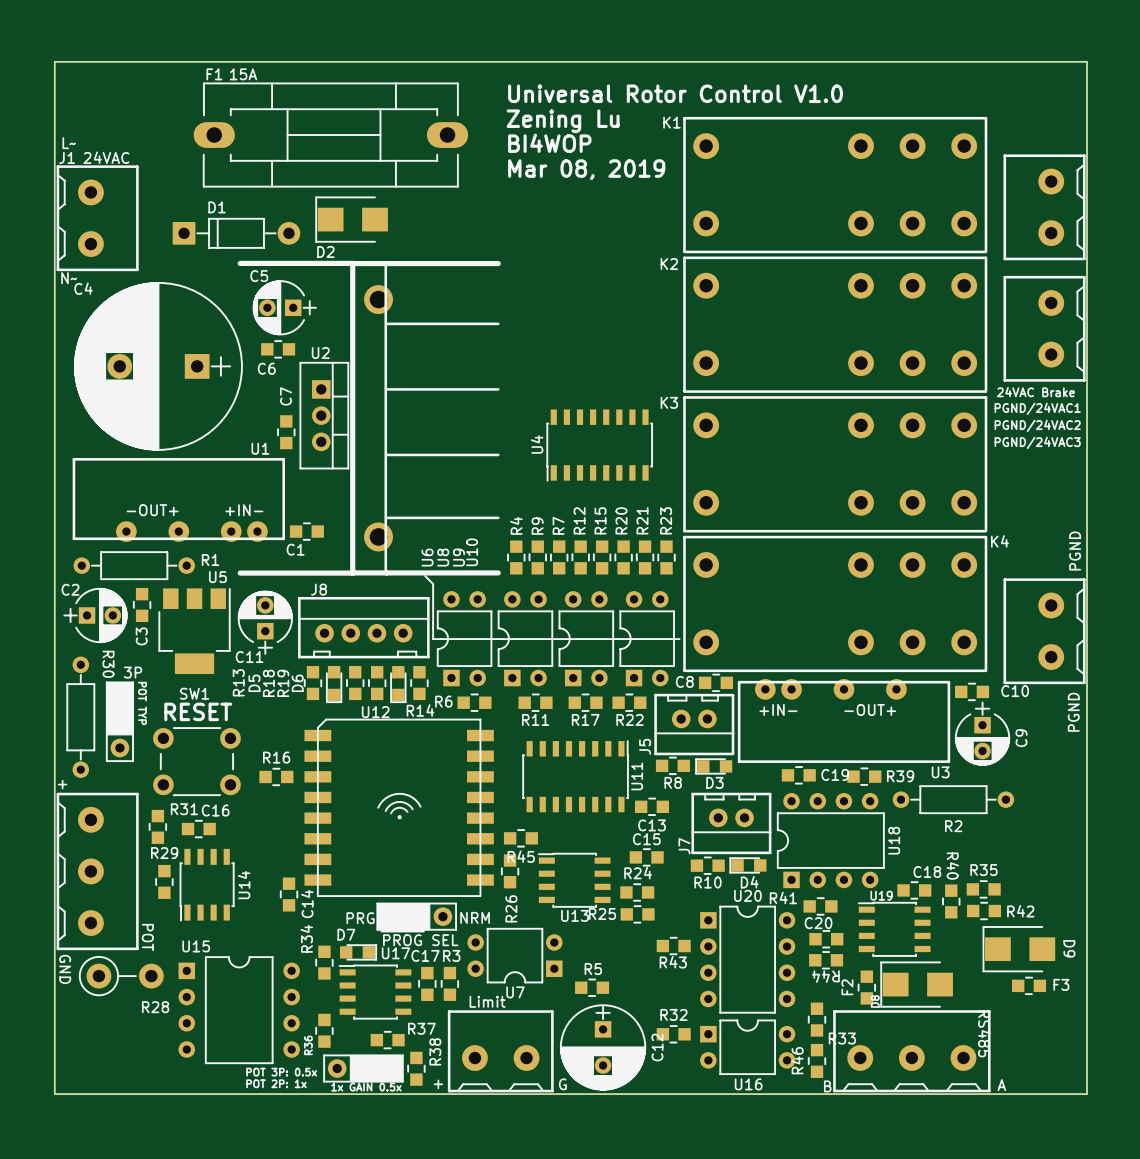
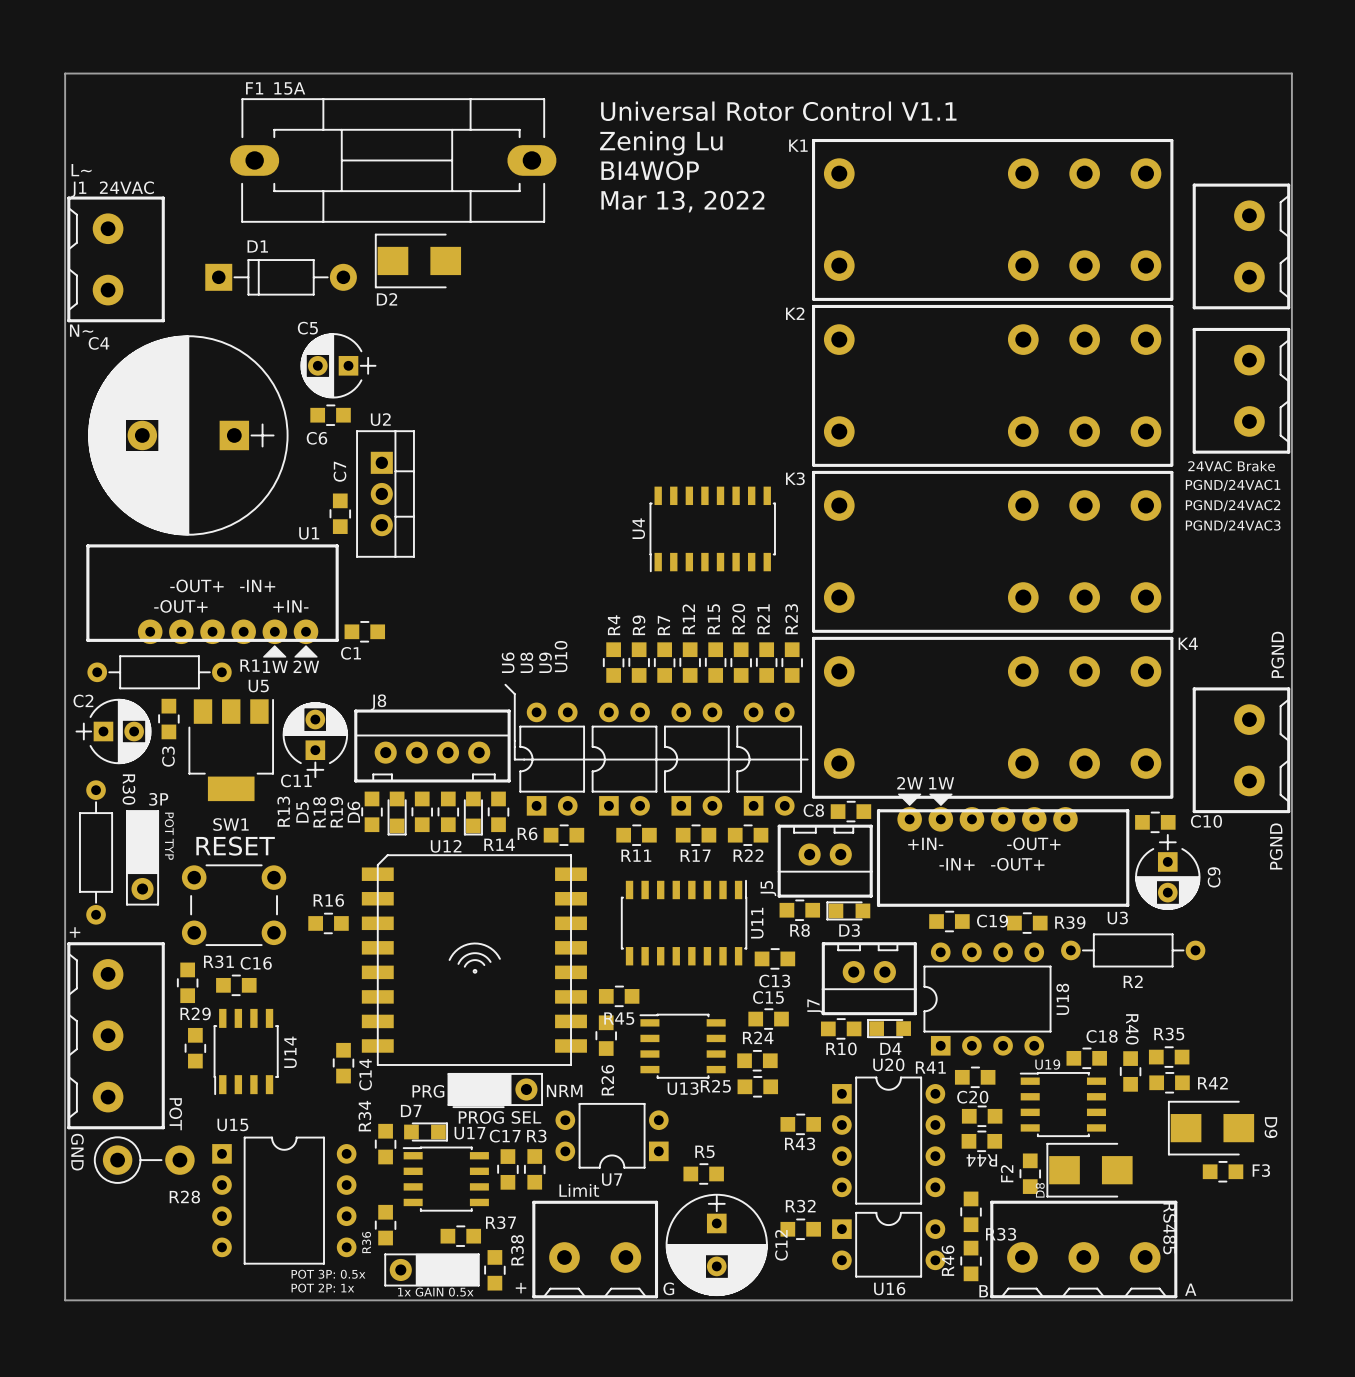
text: Universal Rotor Control V1.0 (675, 93) -> Universal Rotor Control V1.1 (778, 111)
text: Mar 08, 2019 (586, 169) -> Mar 13, 2022 (682, 201)
part: (369, 418) -> none
U1 footprint: [72, 458, 285, 542] -> [86, 544, 339, 658]
U3 footprint: [737, 679, 951, 763] -> [876, 793, 1130, 907]

